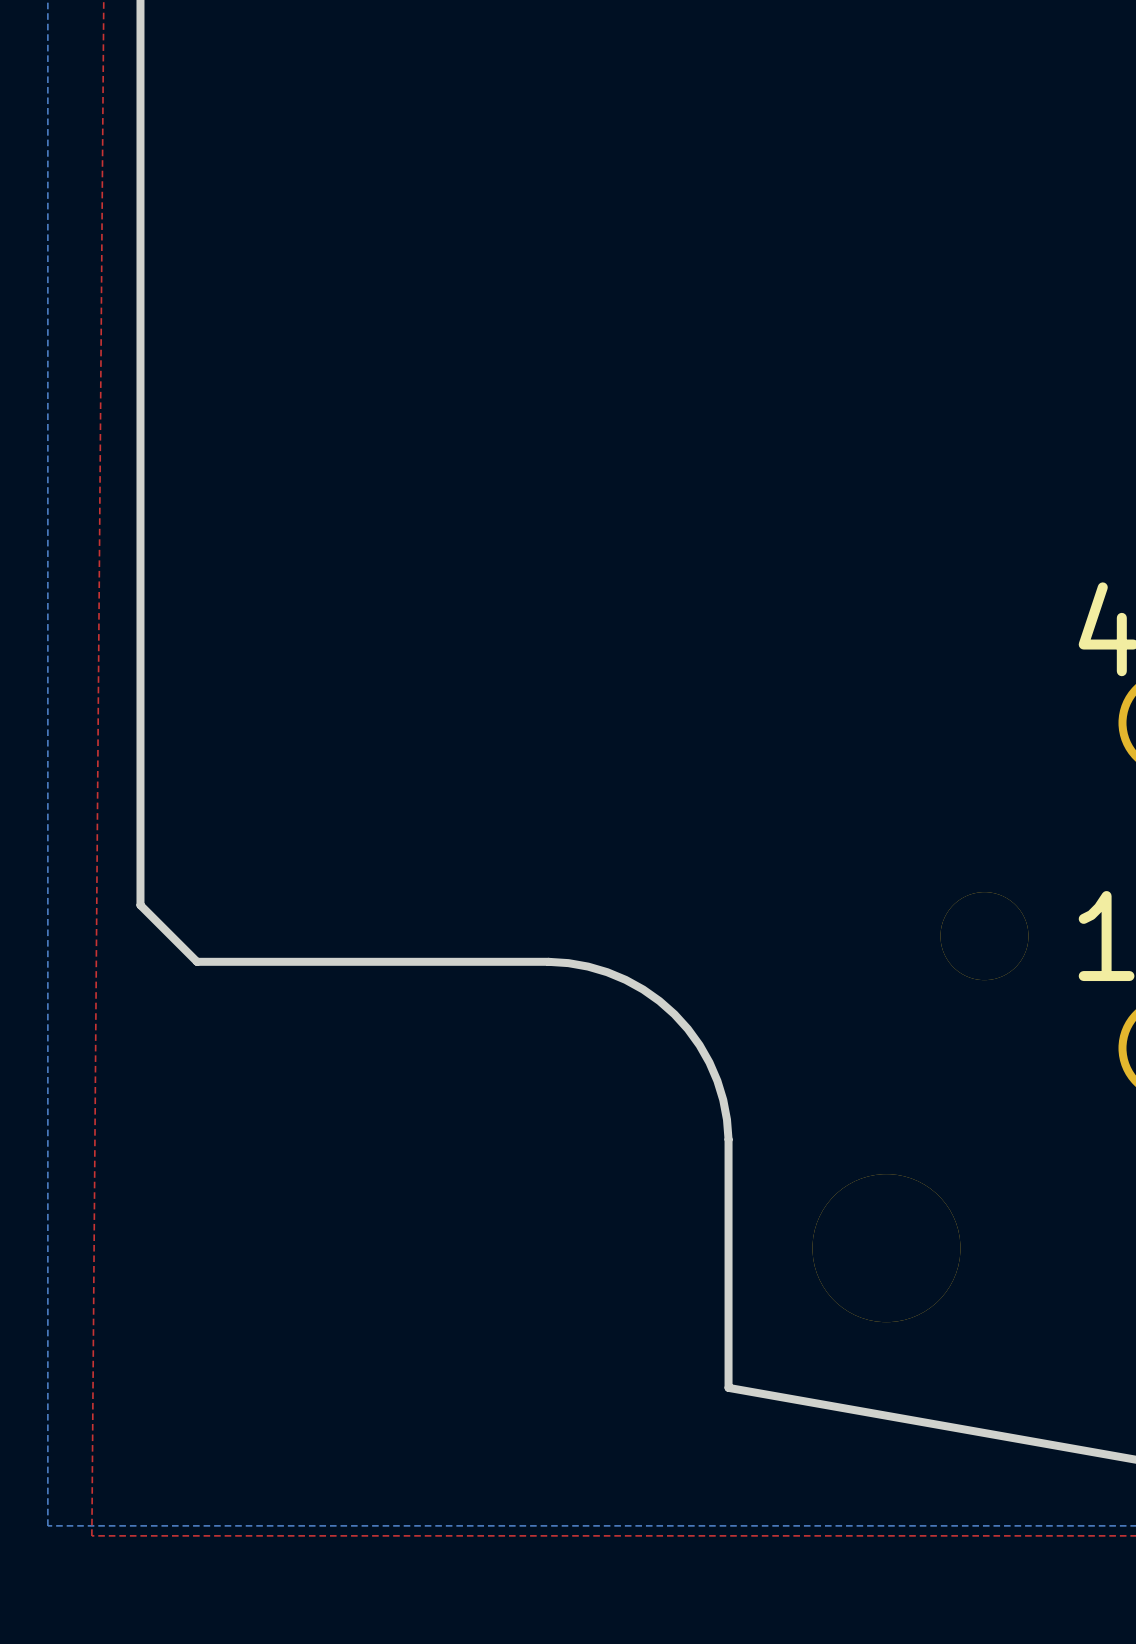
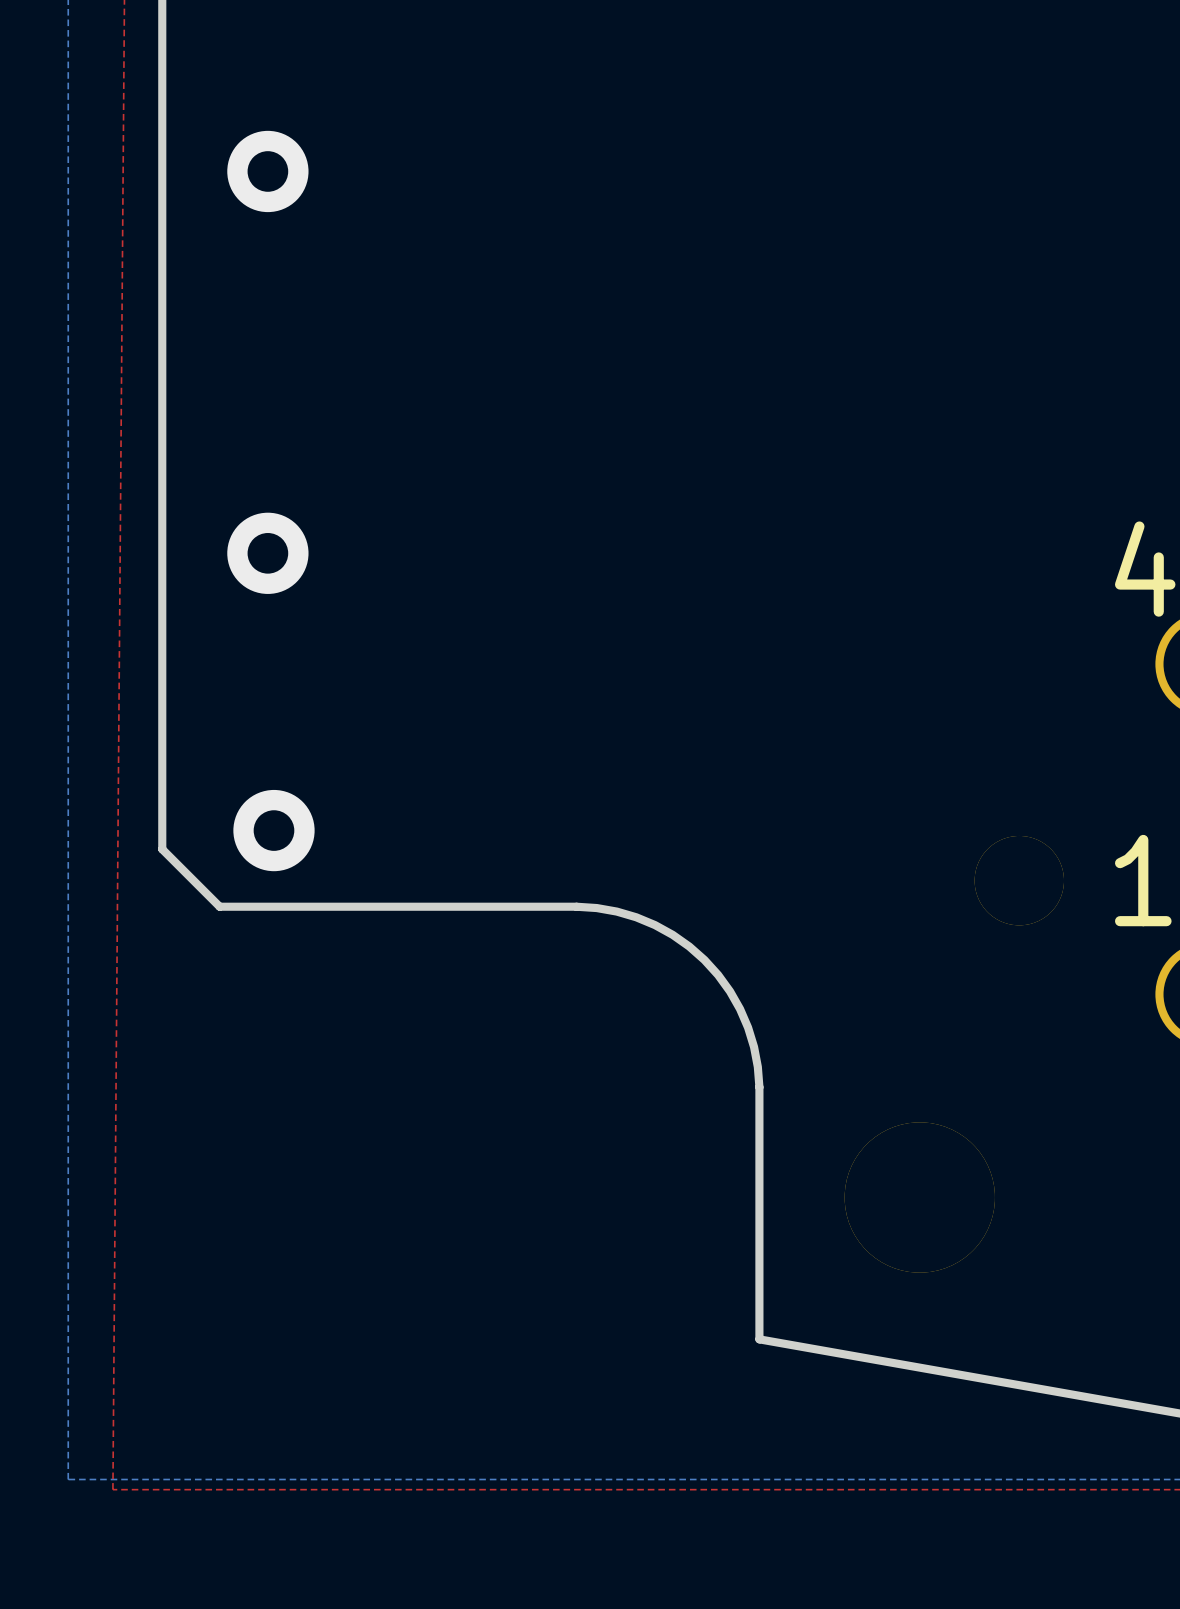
via: none -> (267, 171)
via: none -> (267, 553)
via: none -> (273, 830)

